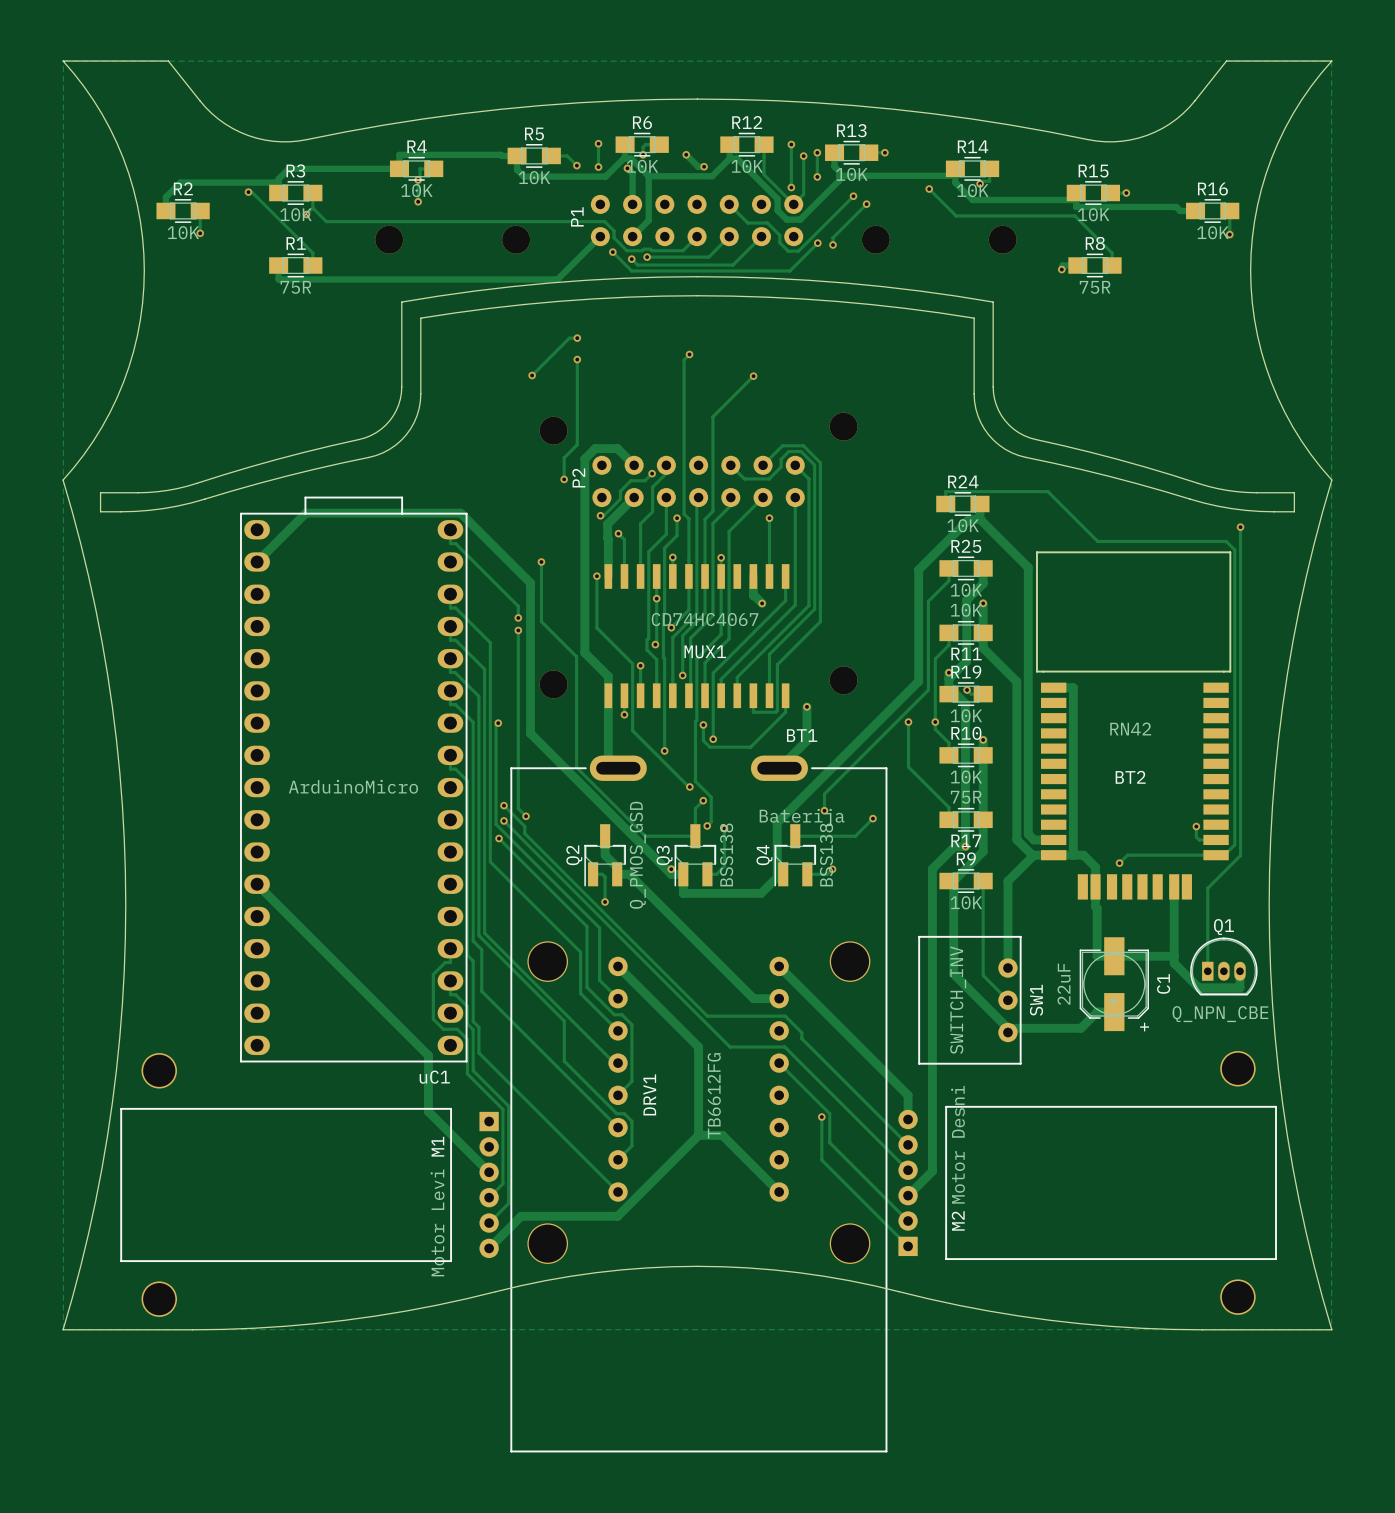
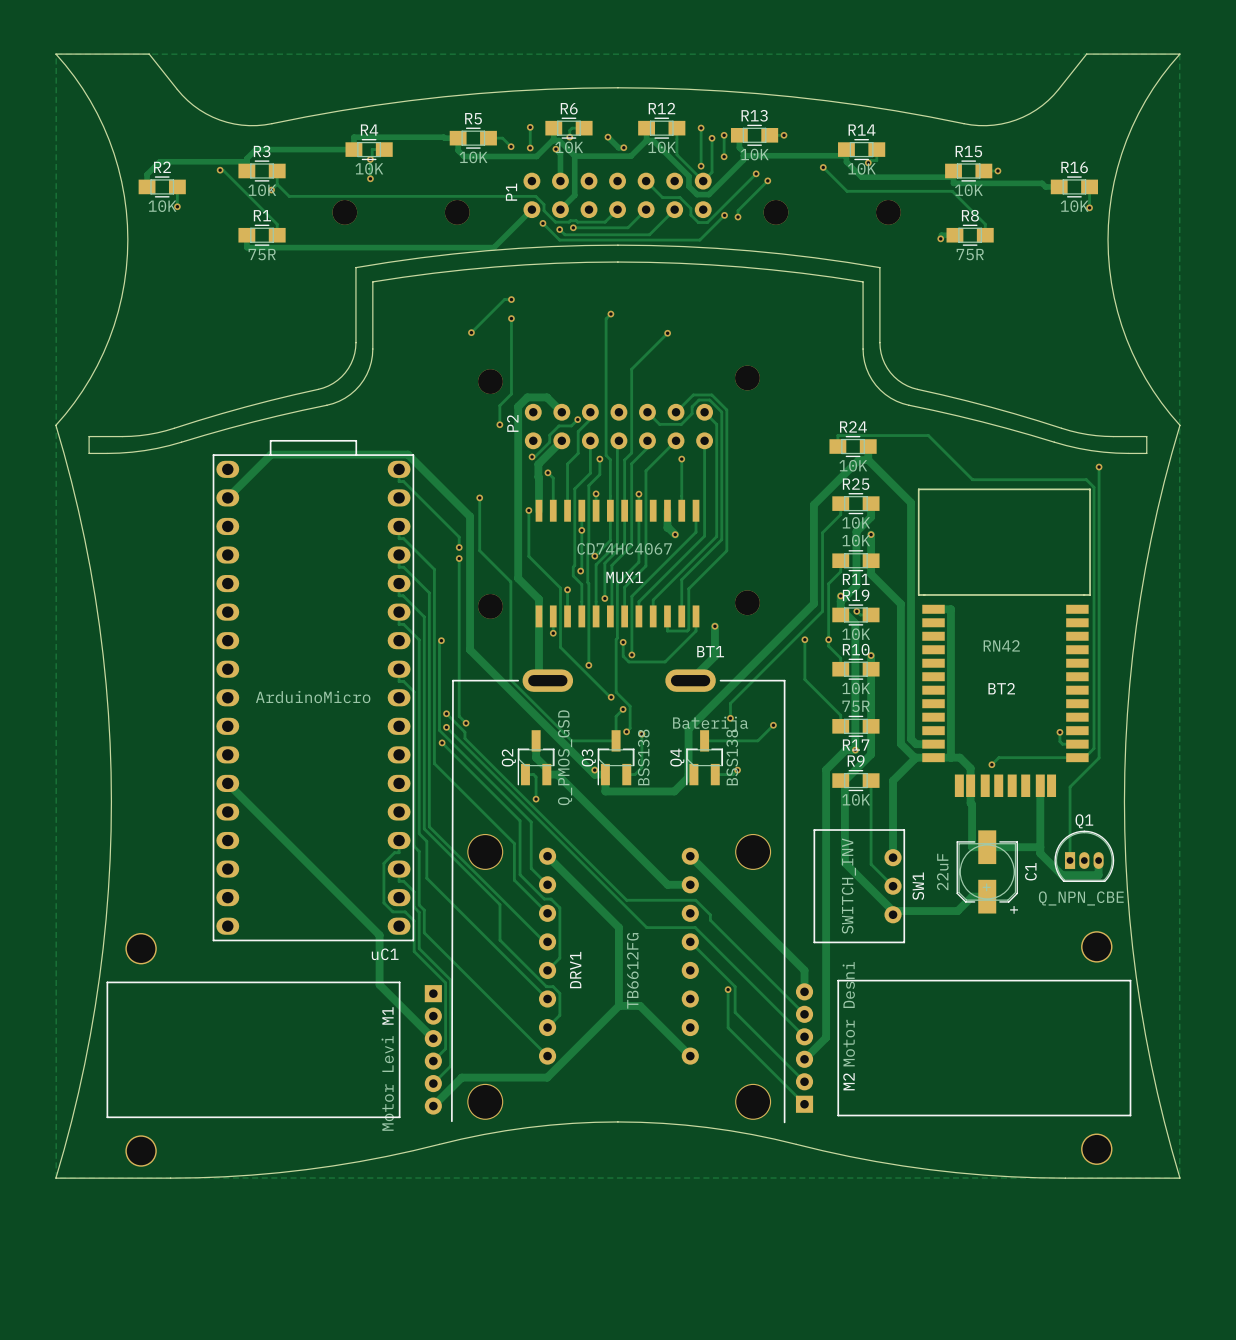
BT1 footprint: [510, 755, 888, 1453] -> [451, 669, 786, 1124]

